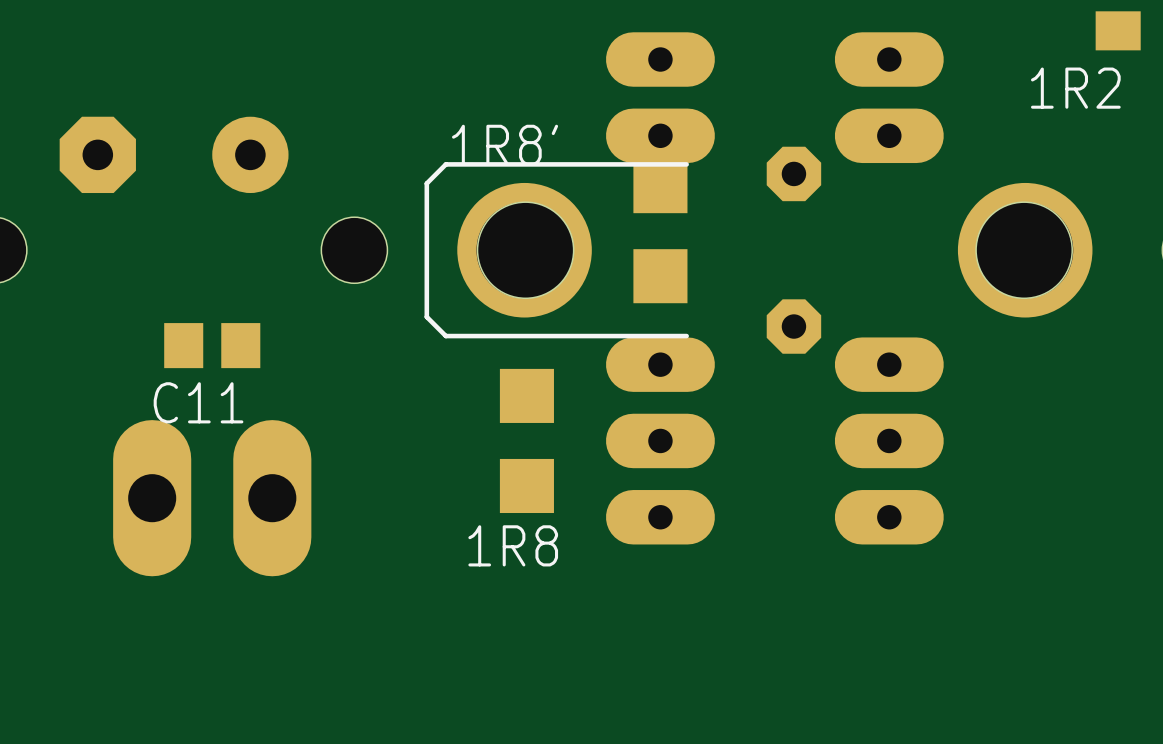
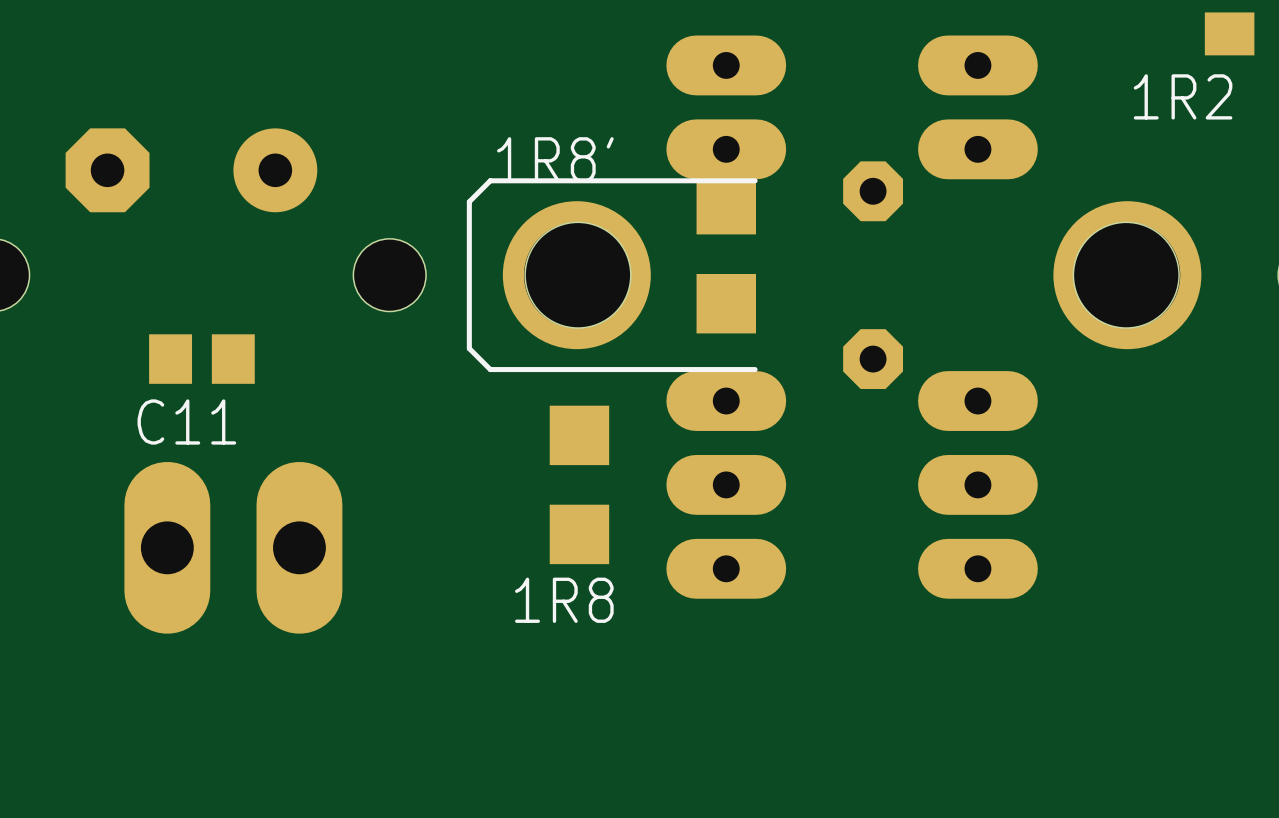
C11 position: (212, 345) -> (201, 359)

